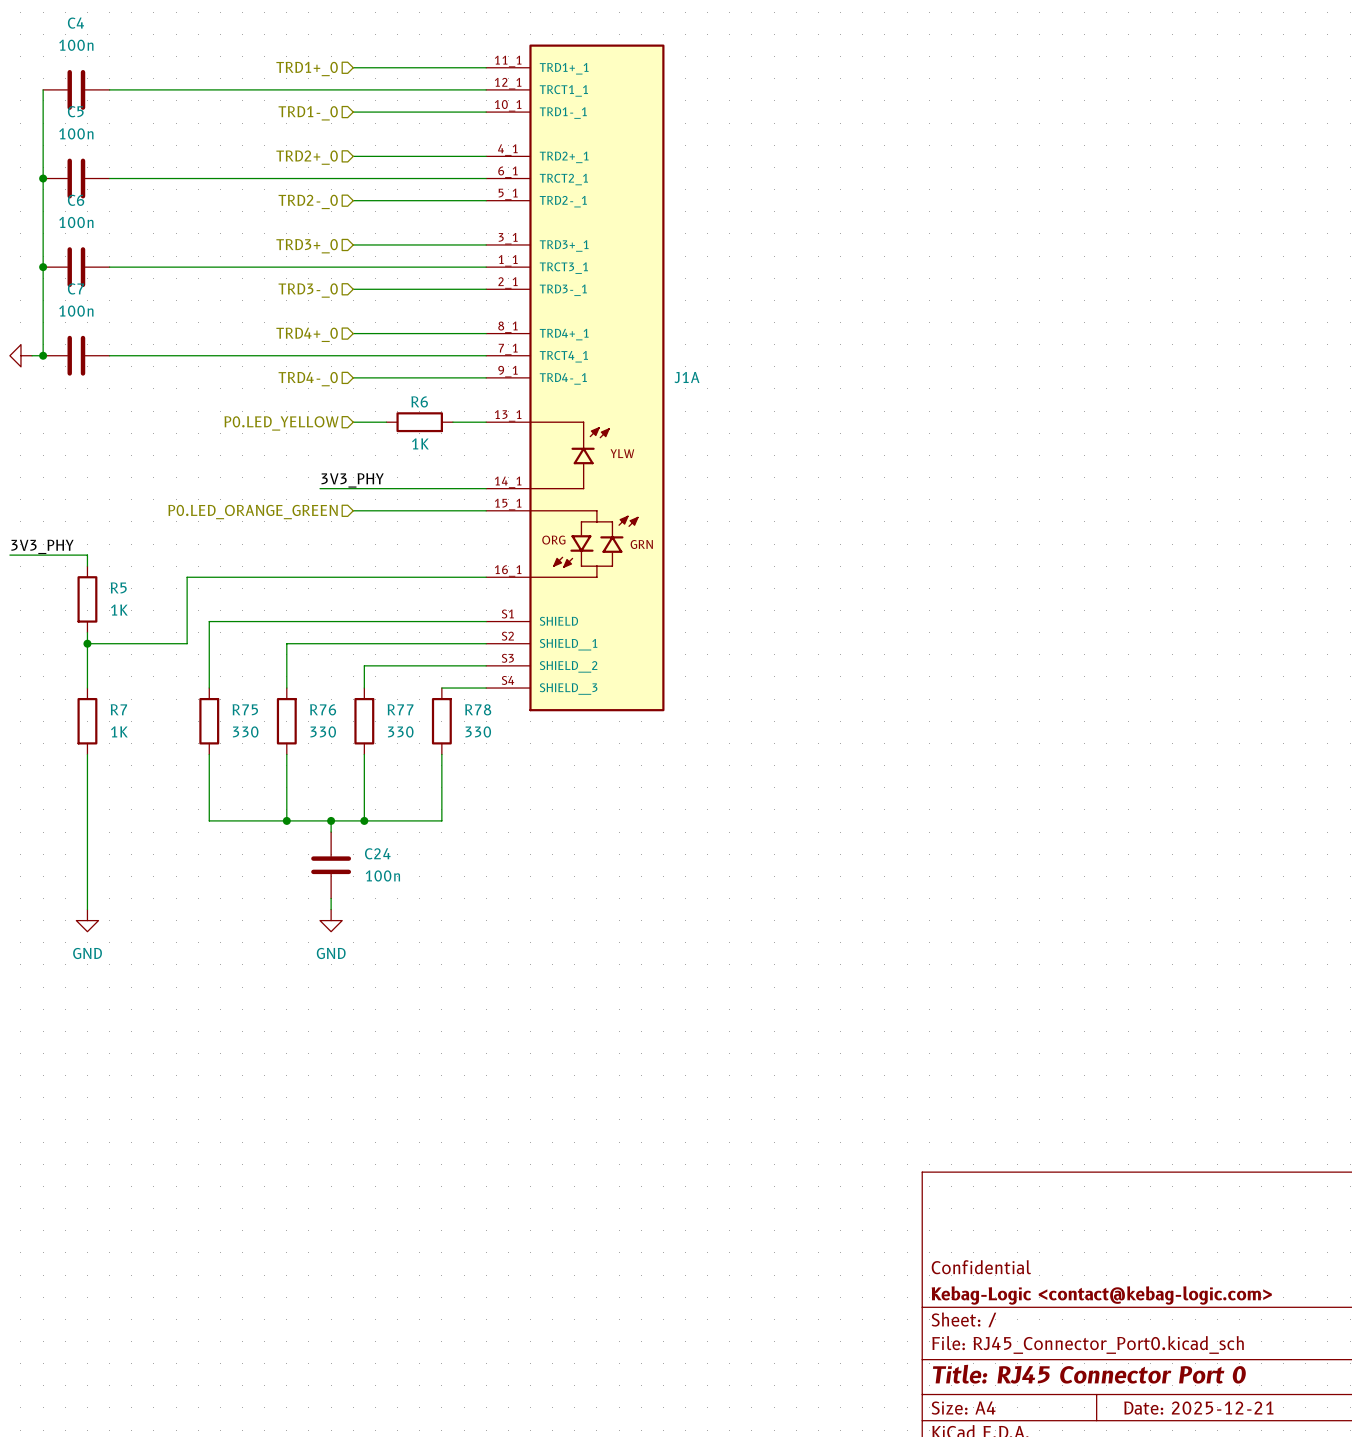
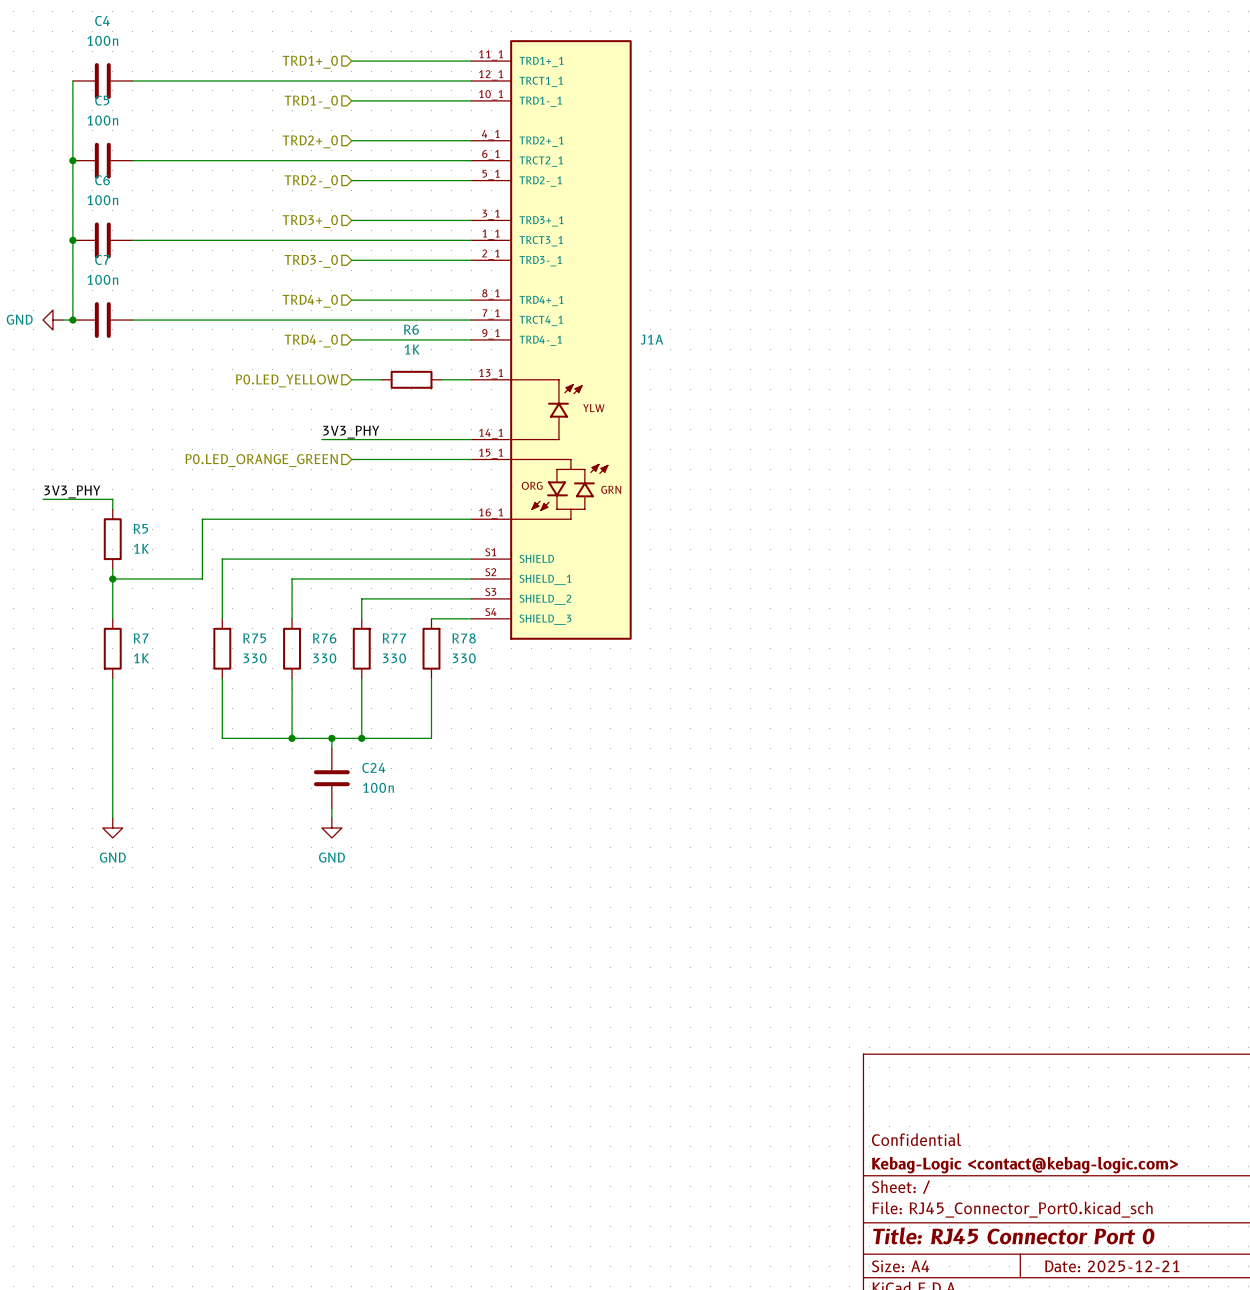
R6 name position: R6 (419, 401) -> R6 (411, 329)
R6 value position: 1K (420, 443) -> 1K (412, 349)

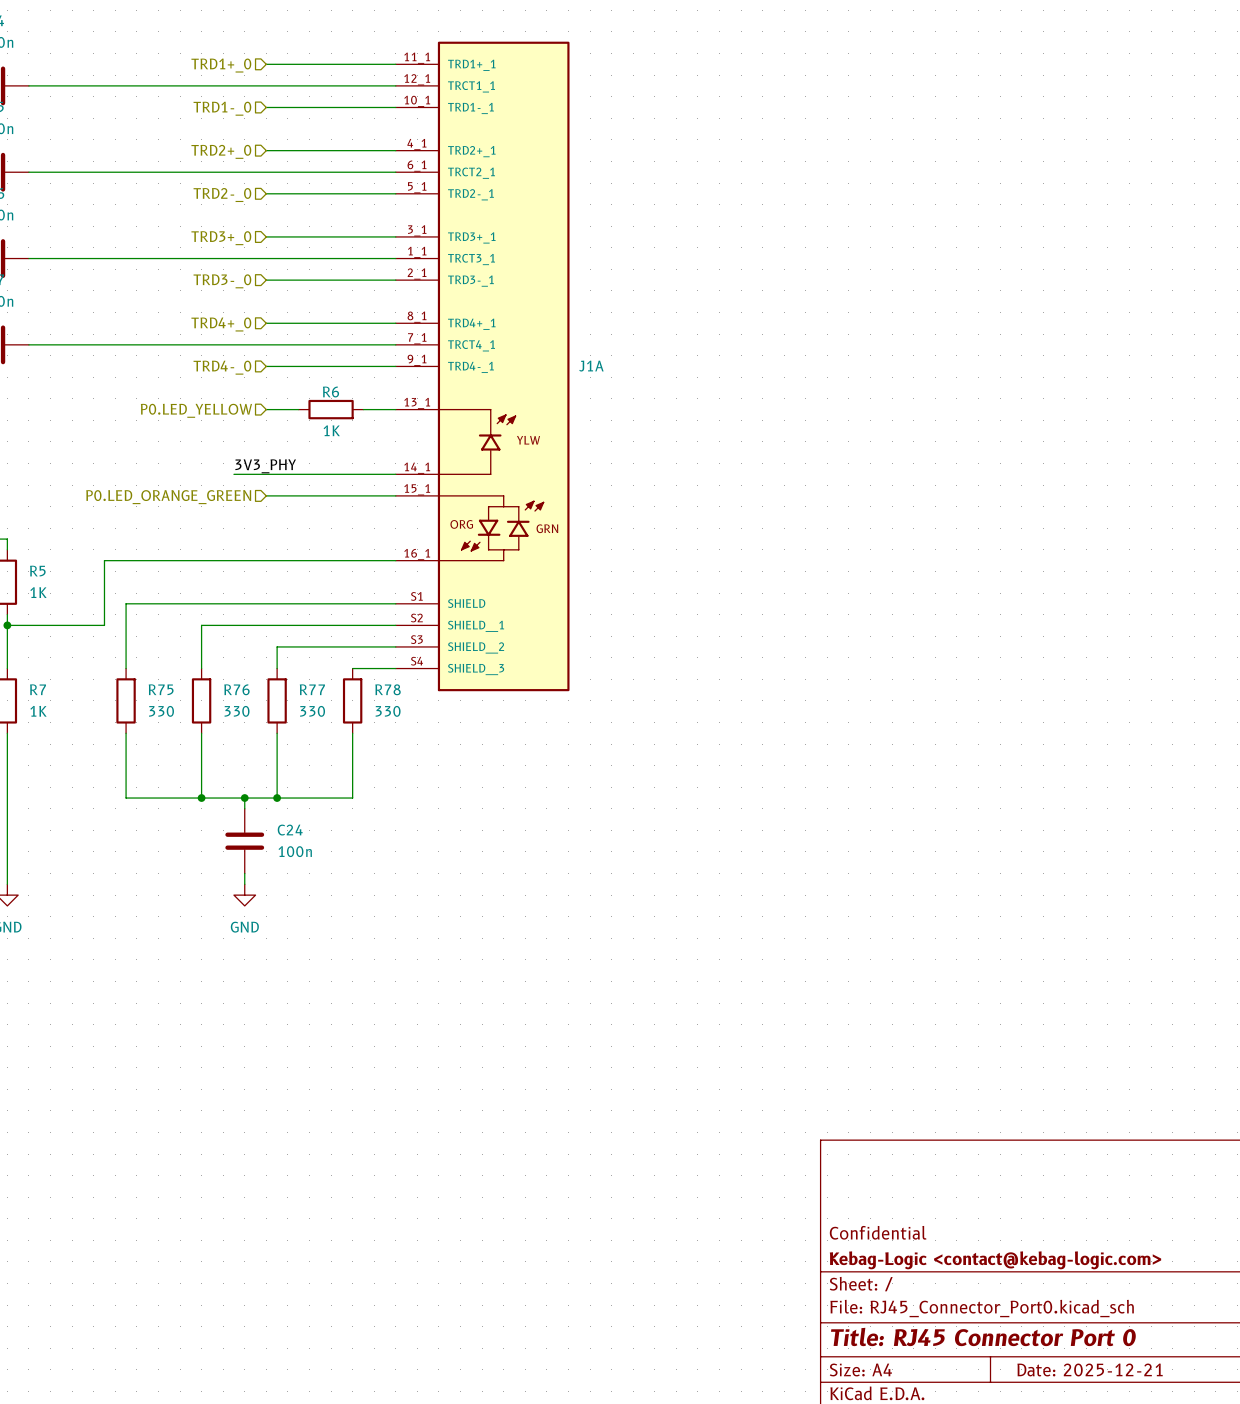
R6 name position: R6 (411, 329) -> R6 (330, 392)
R6 value position: 1K (412, 349) -> 1K (331, 430)

